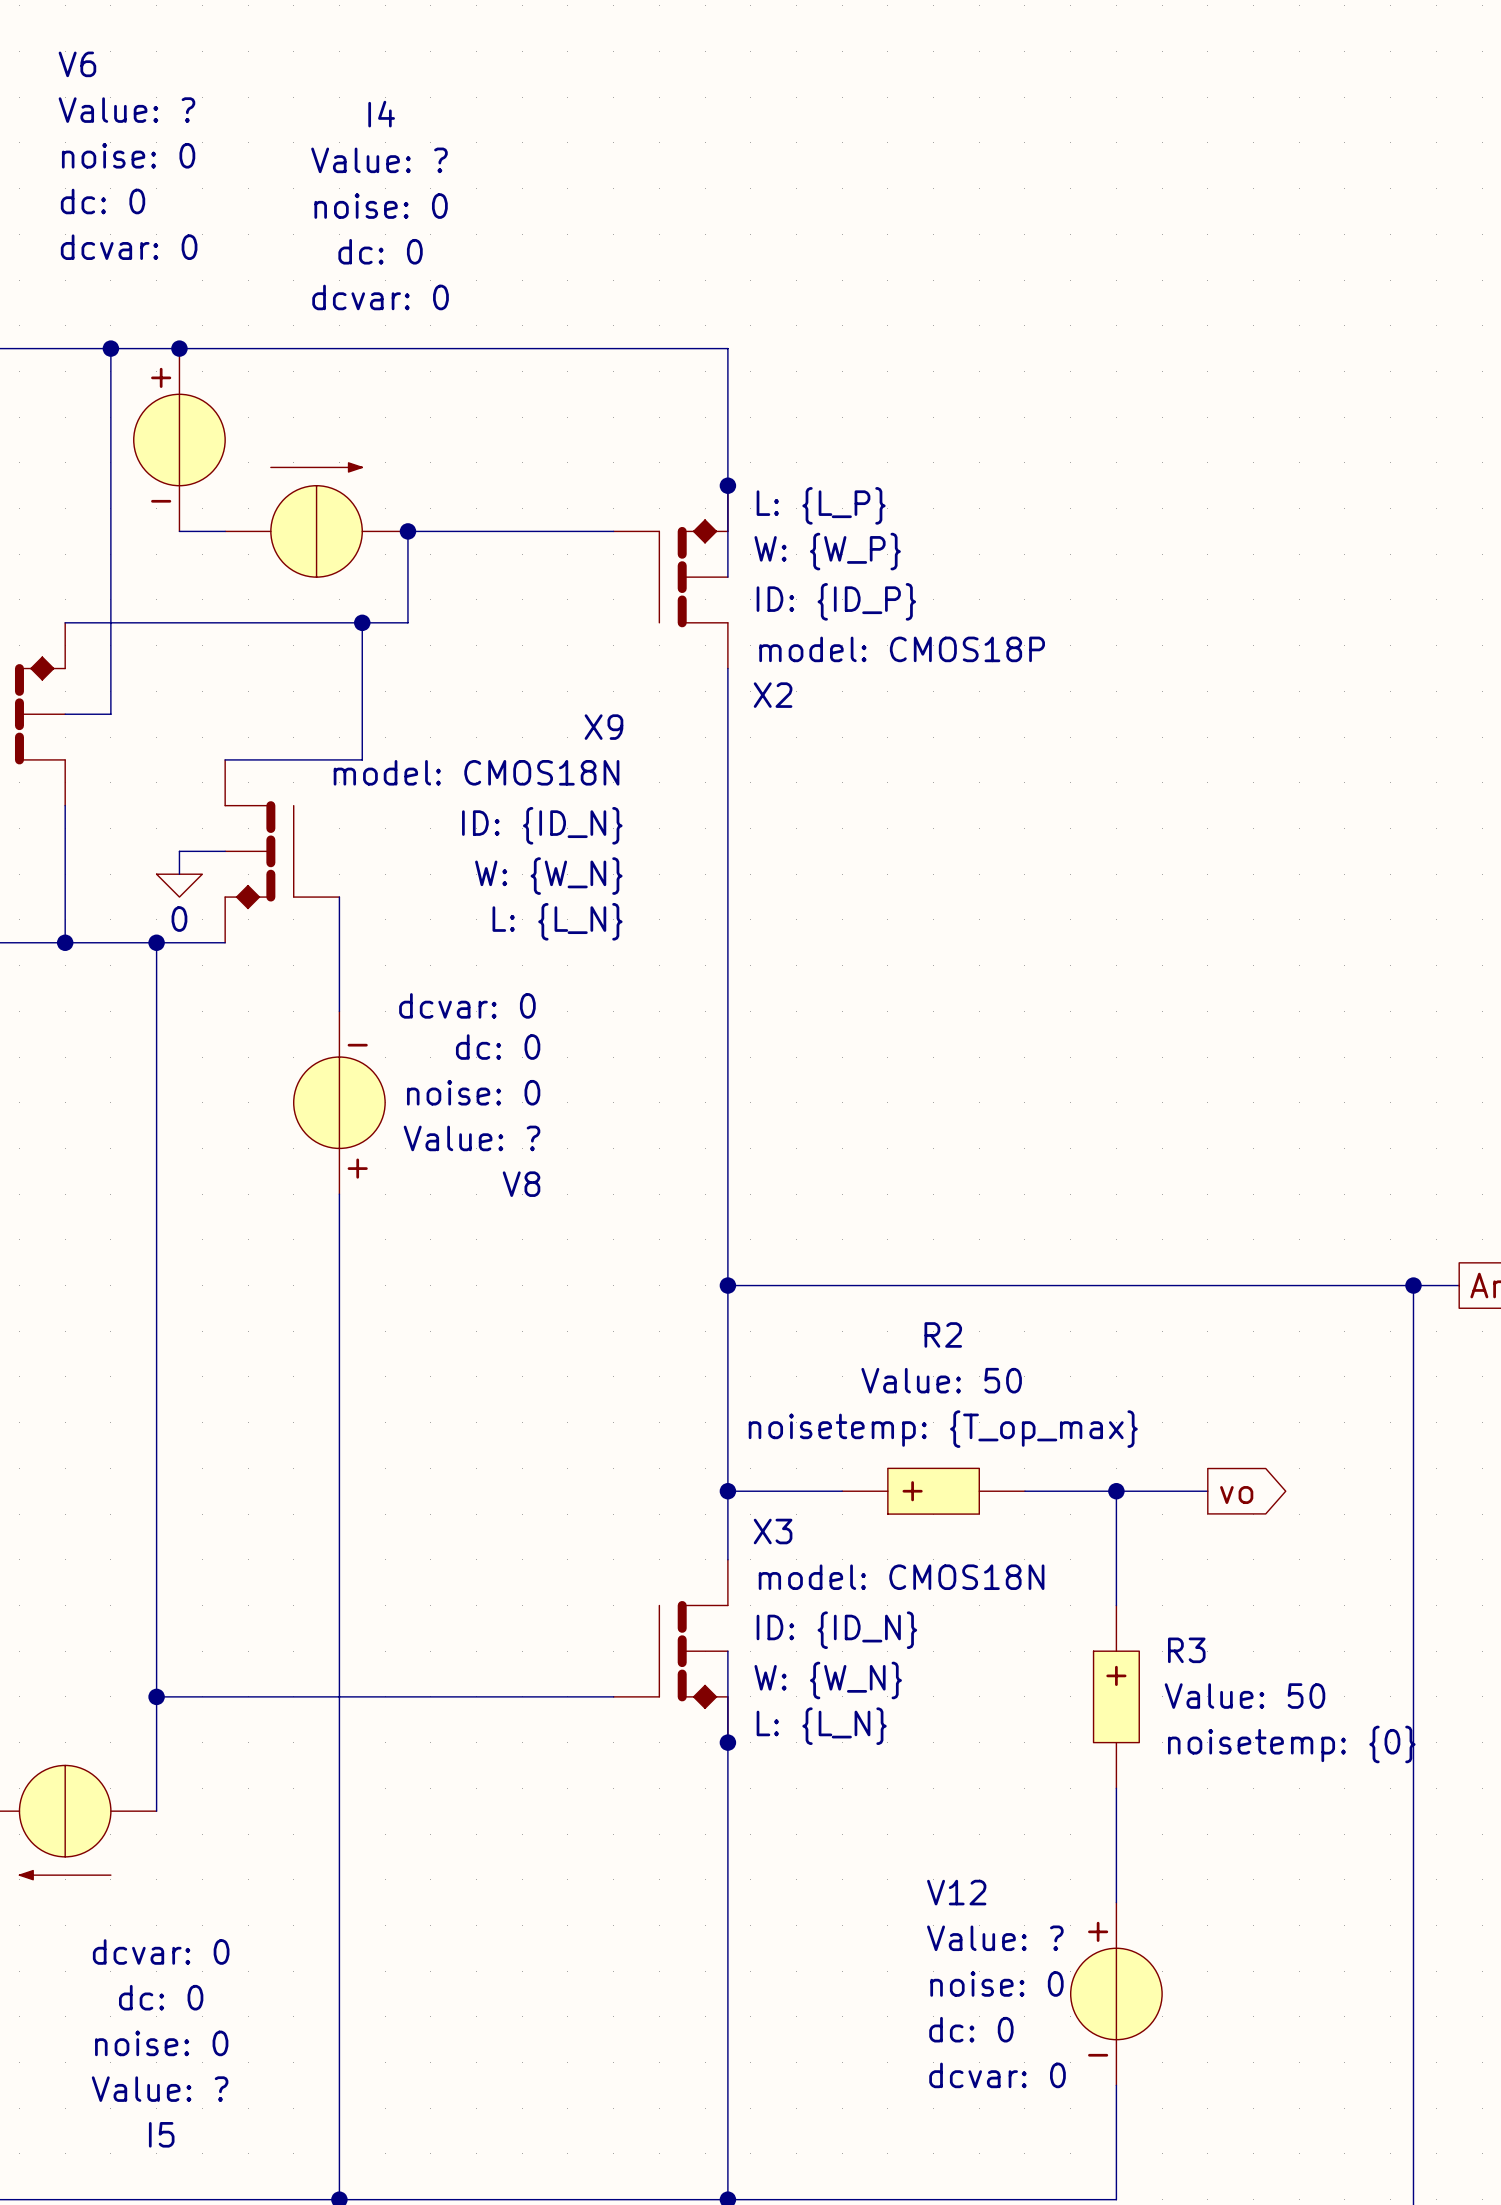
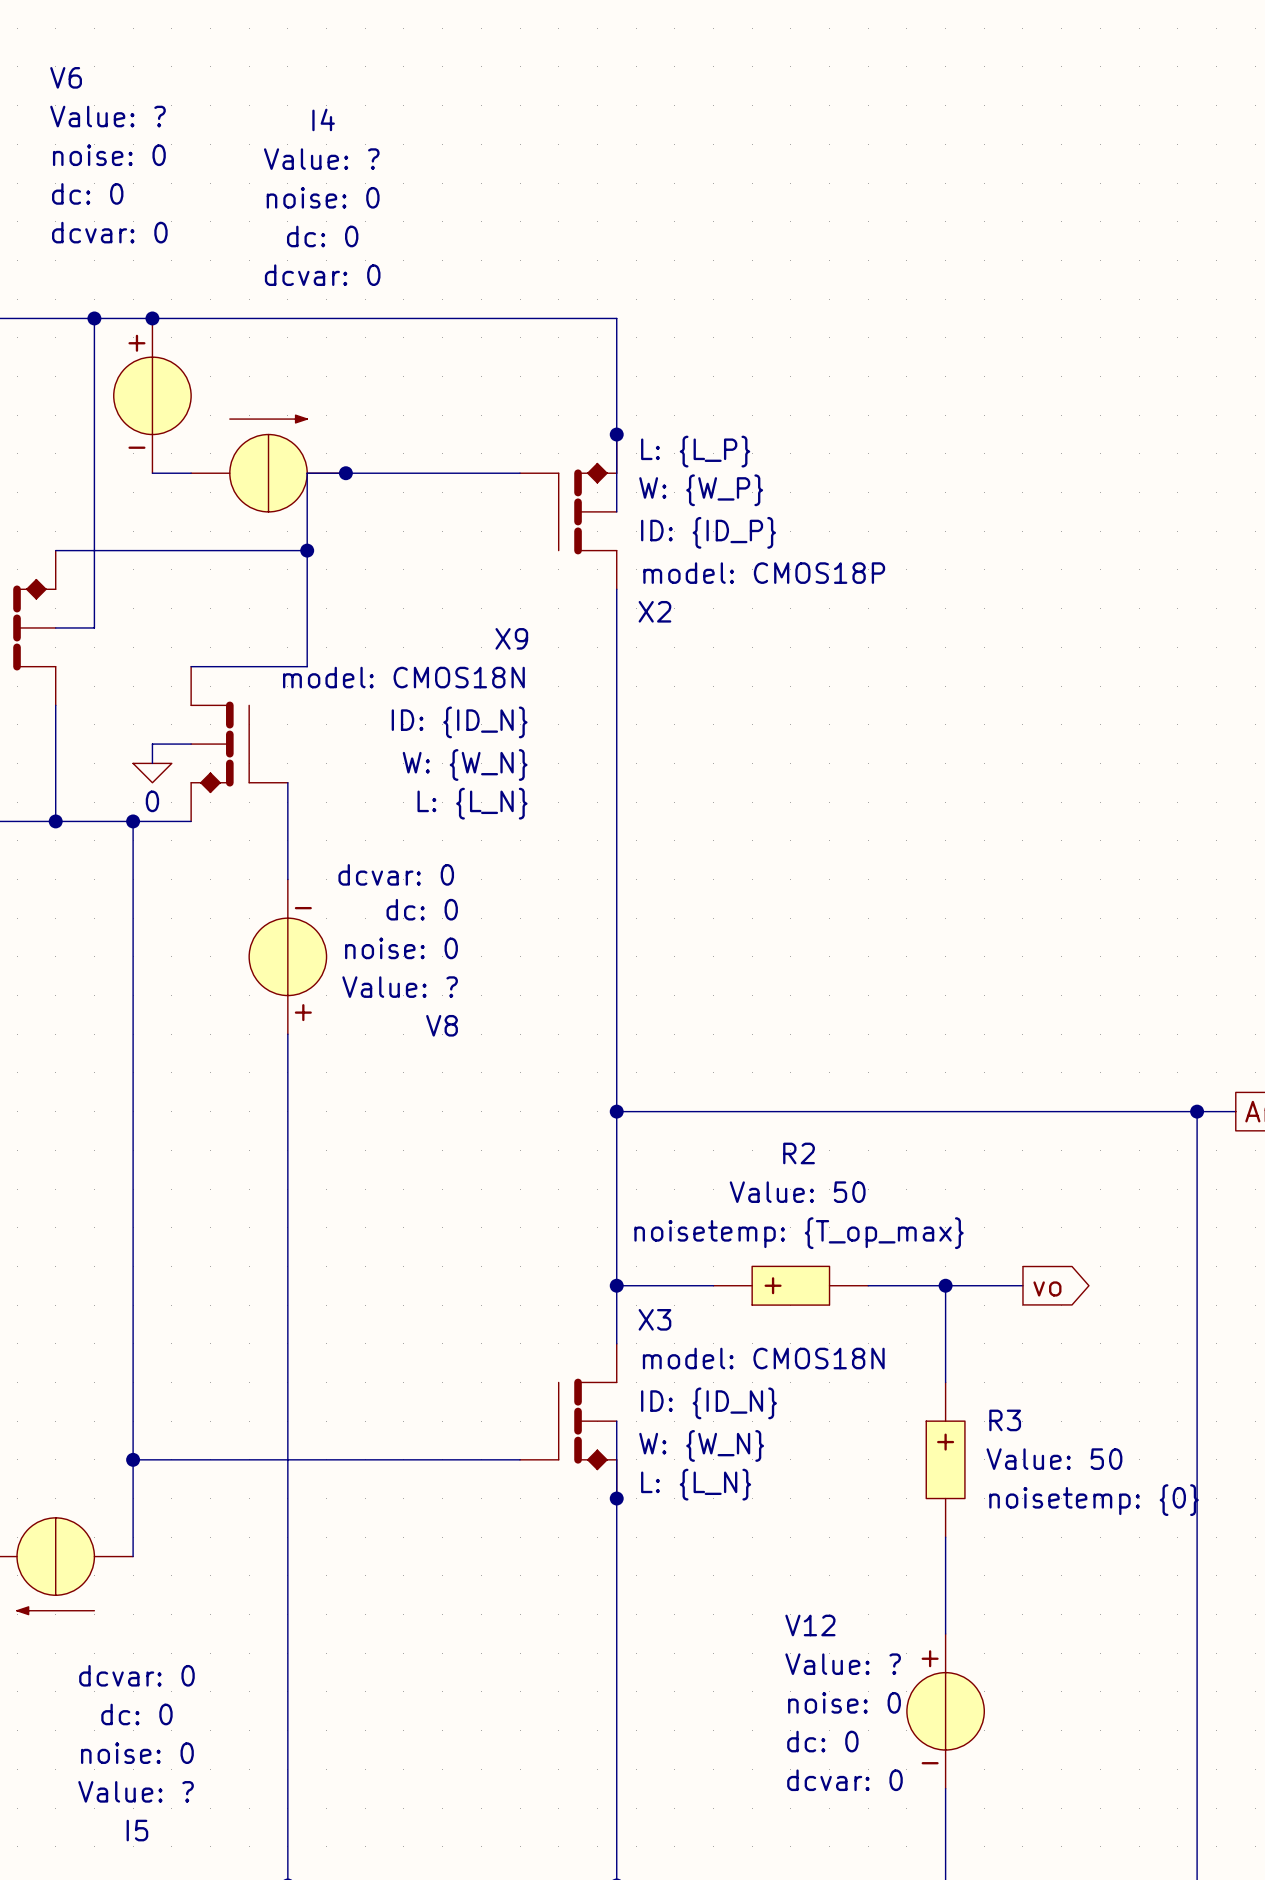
wire: (407, 531) (407, 622) (362, 622) -> (345, 473) (307, 473) (307, 550)

